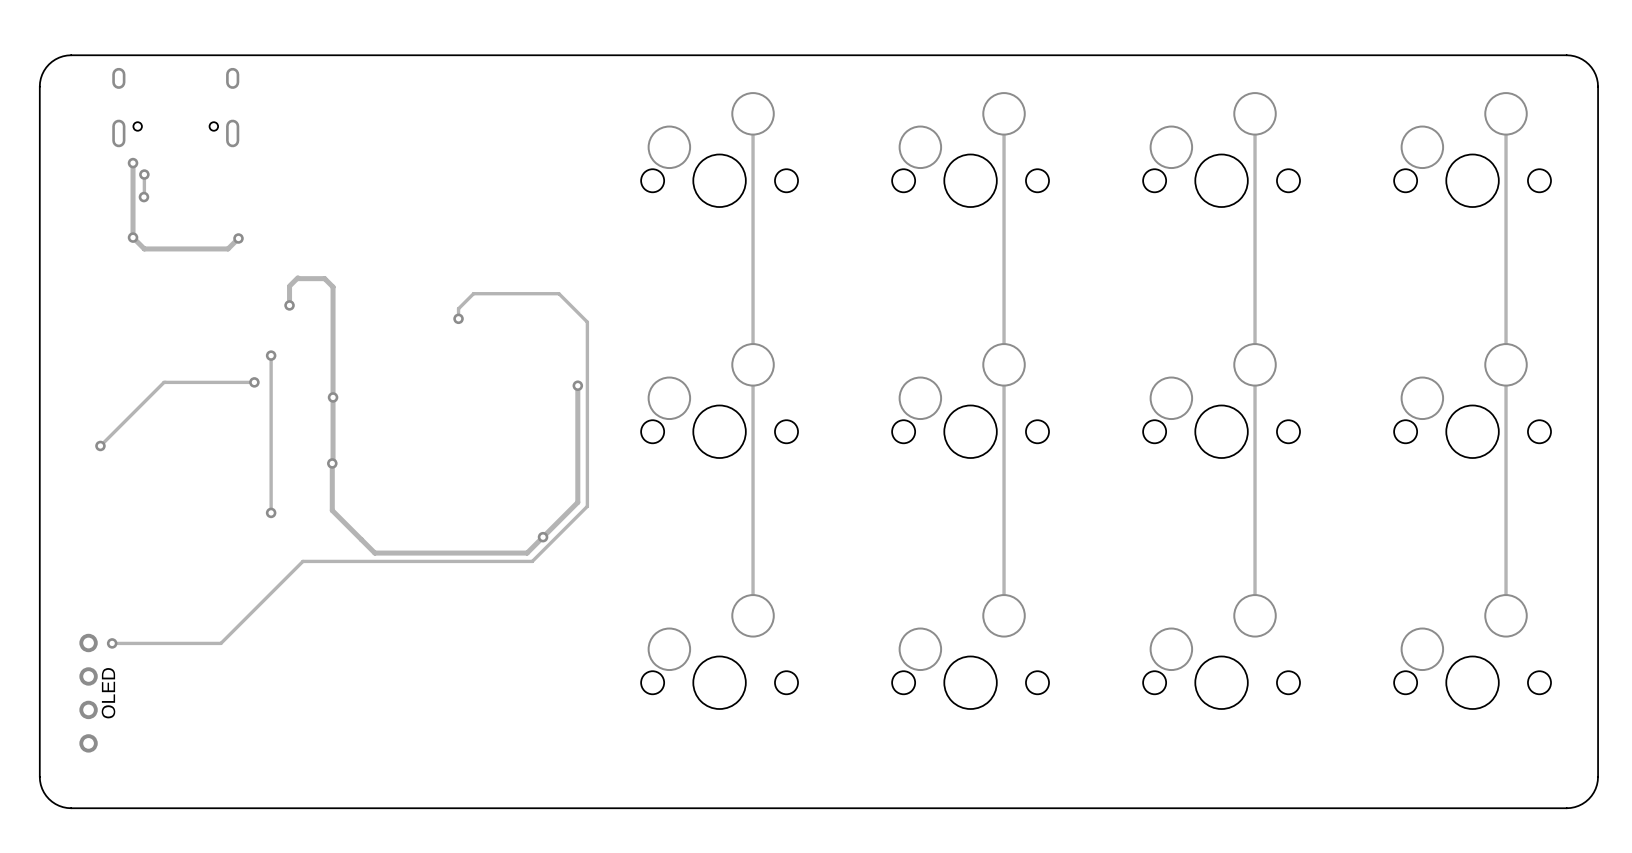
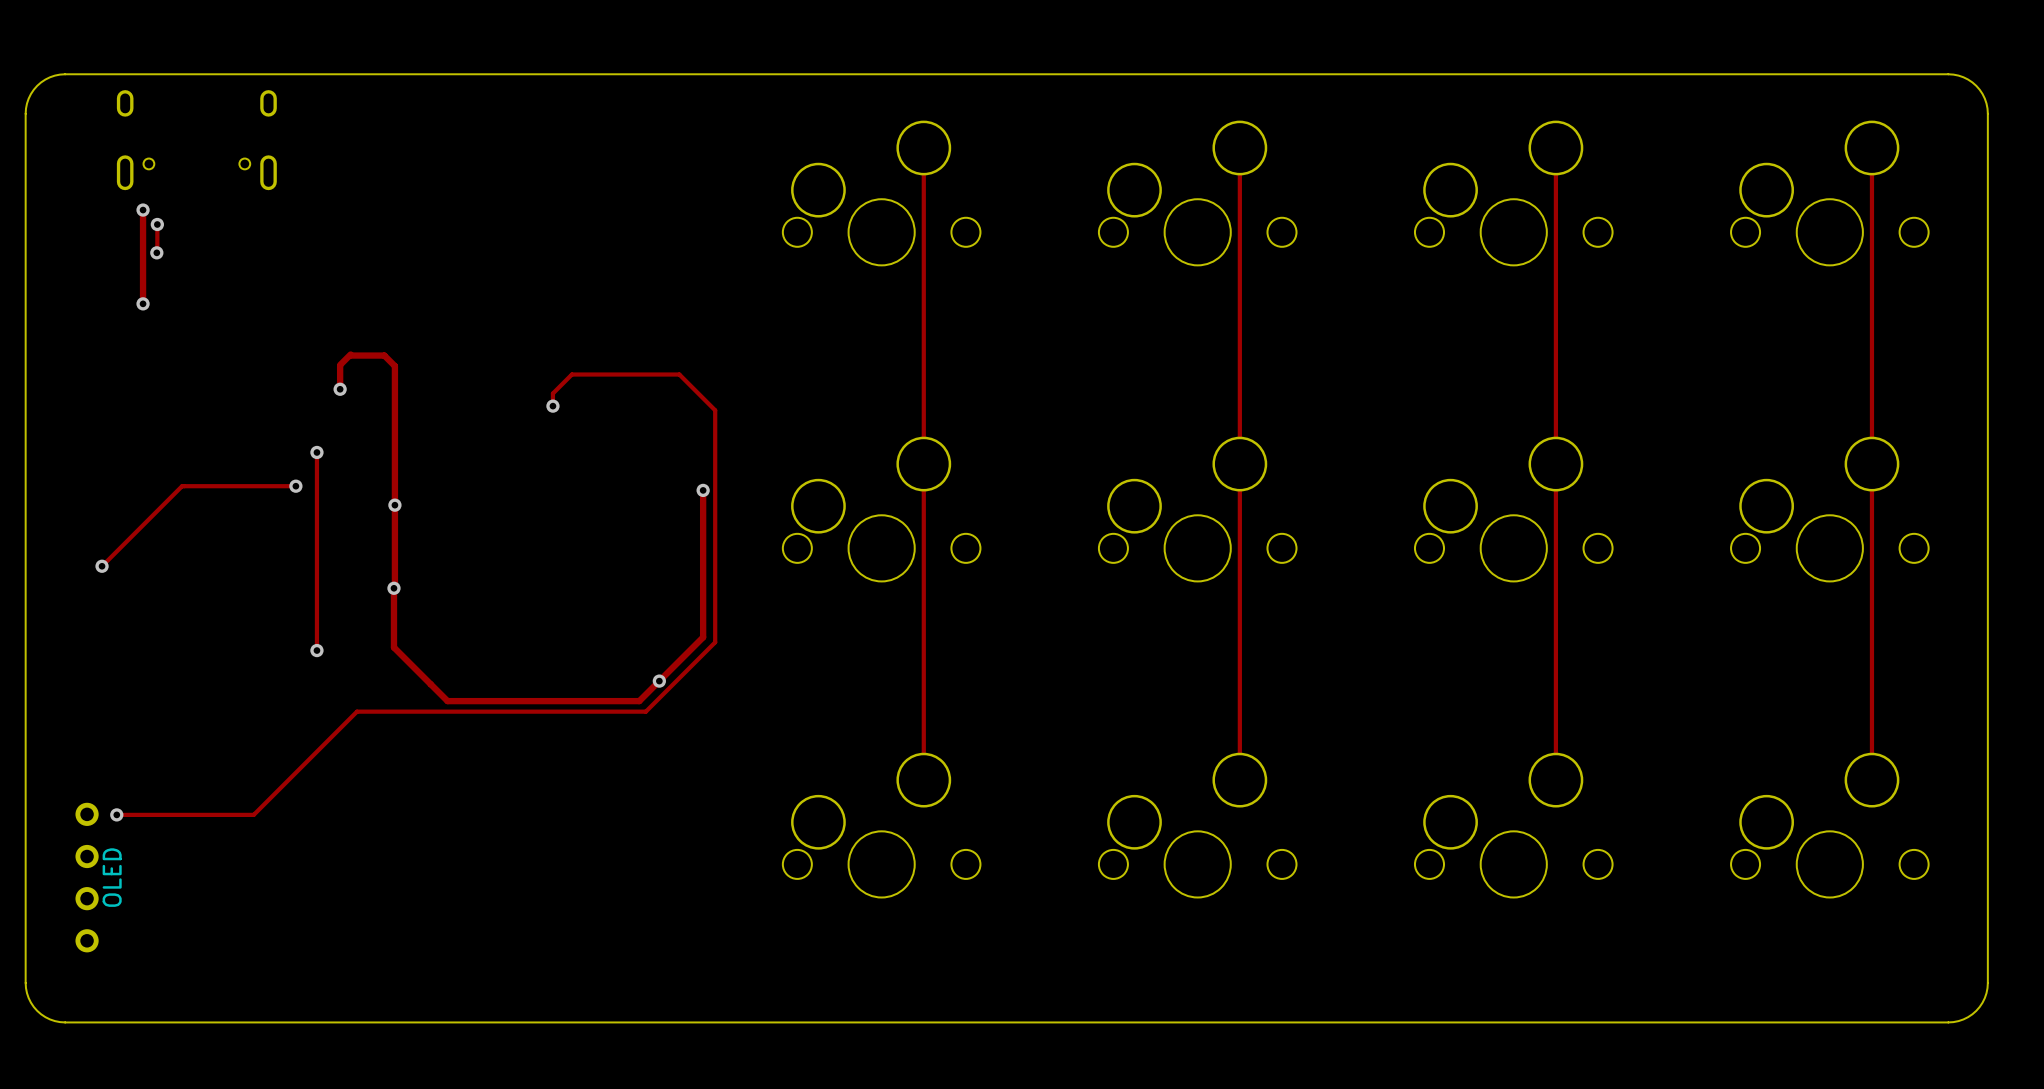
track: (133, 237) (144, 248) (228, 248) (238, 238) -> none
via: (238, 238) -> none

